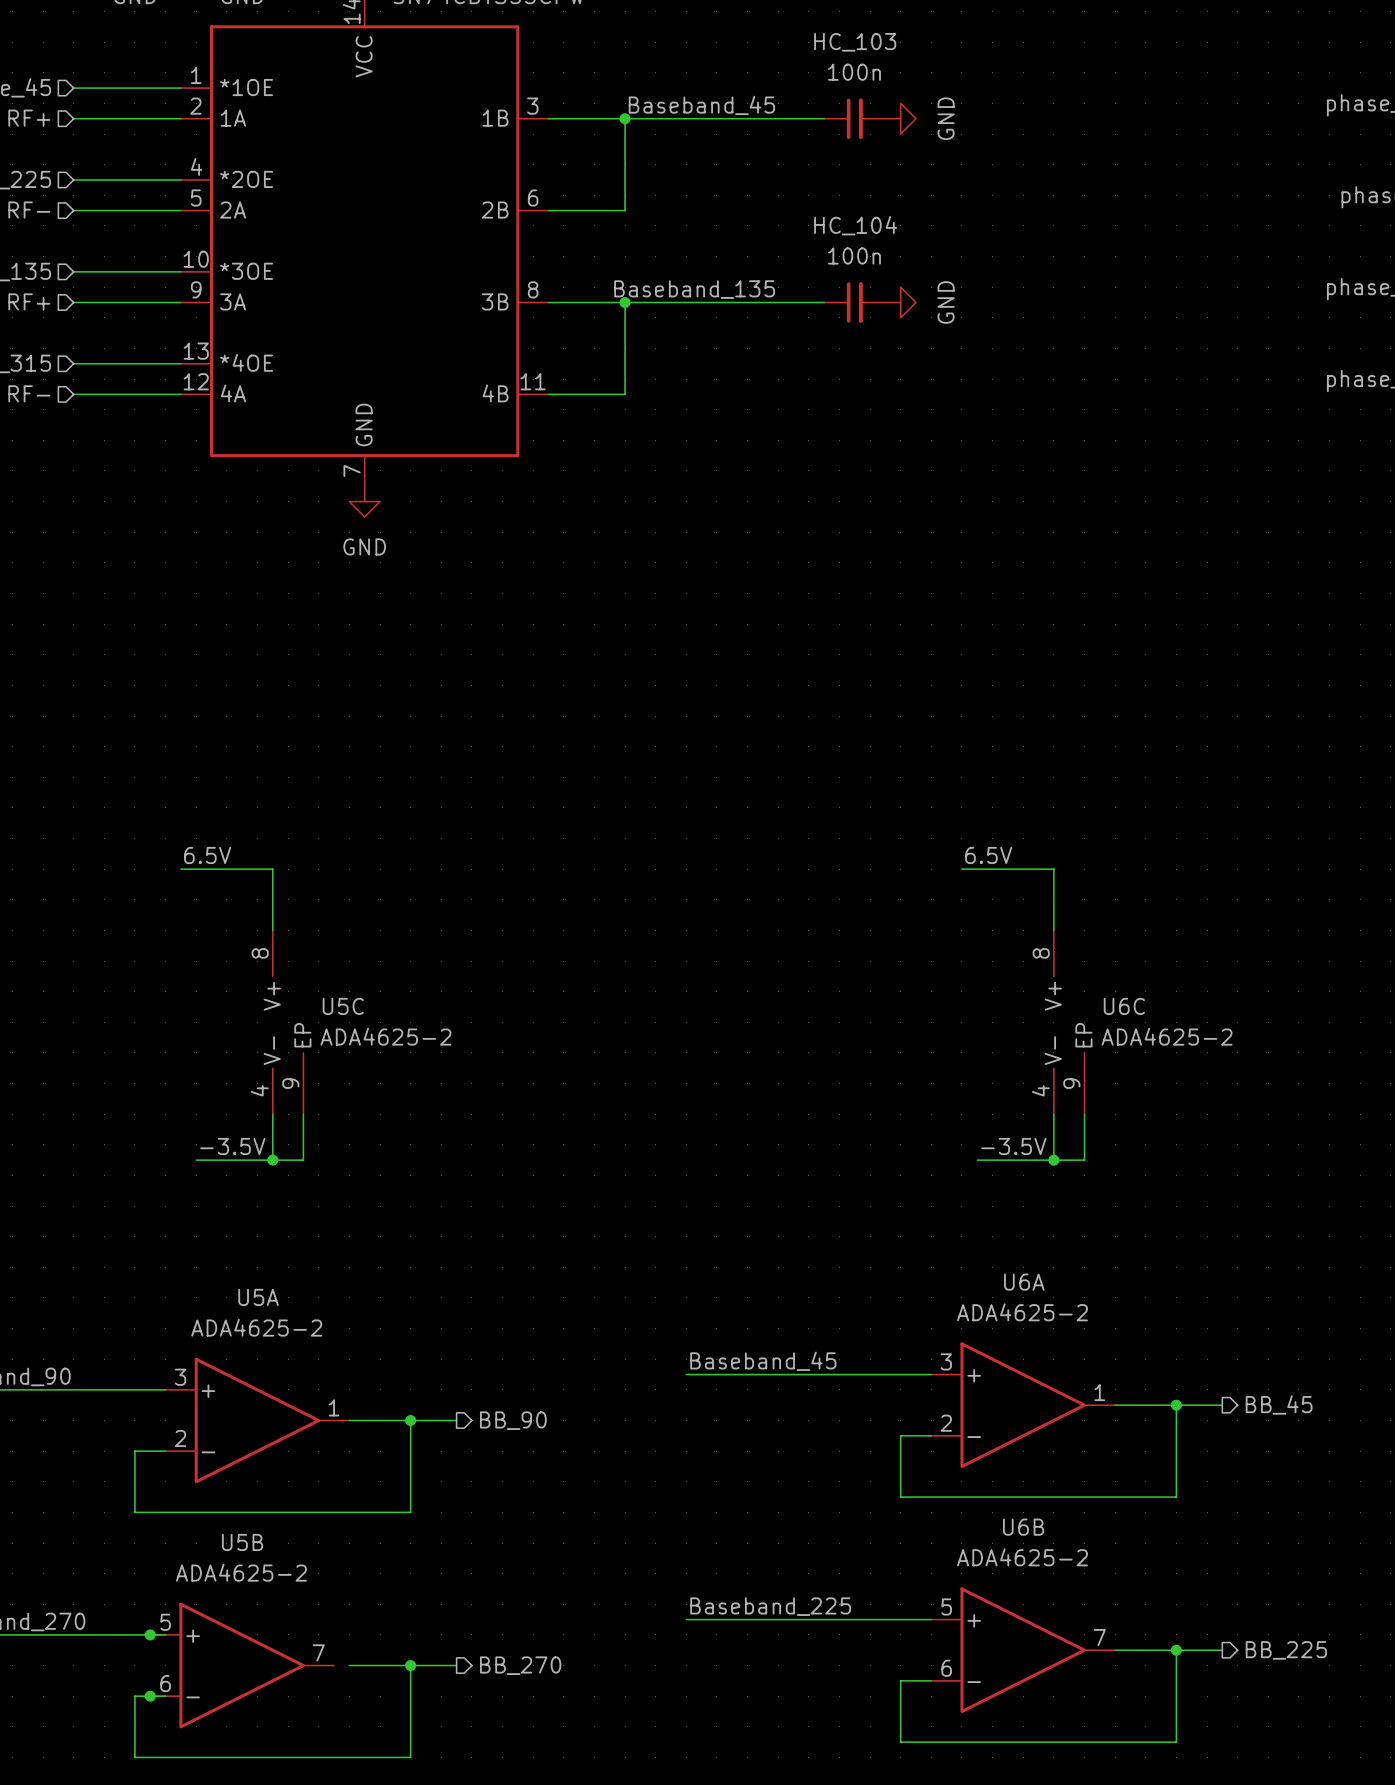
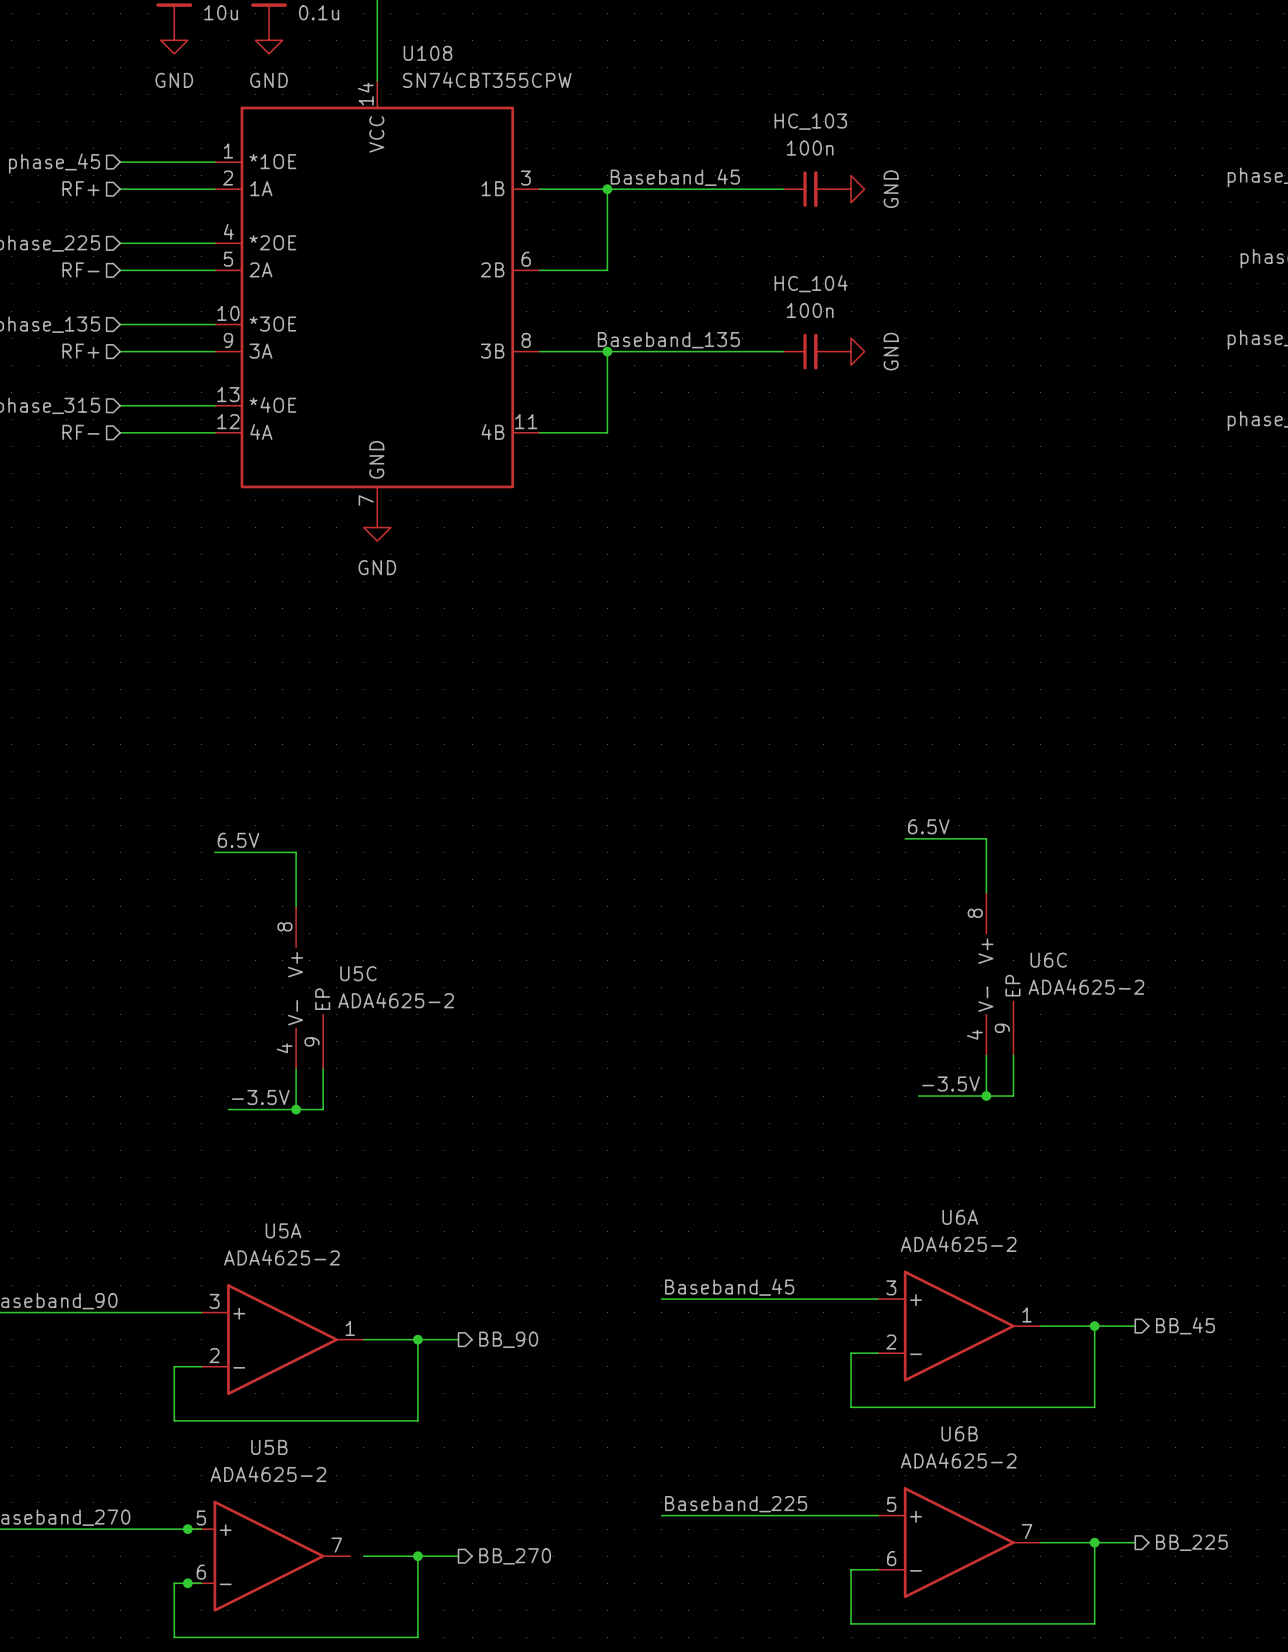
label position: 6.5V (988, 855) -> 6.5V (928, 826)
wire: (961, 869) (1053, 869) -> (905, 838) (986, 838) (986, 852)
U6C position: (1069, 1022) -> (999, 974)
wire: (1084, 1144) (1084, 1160) (977, 1160) -> (1013, 1096) (918, 1096)
label position: -3.5V (1013, 1146) -> -3.5V (951, 1083)
junction position: (1053, 1160) -> (986, 1096)

